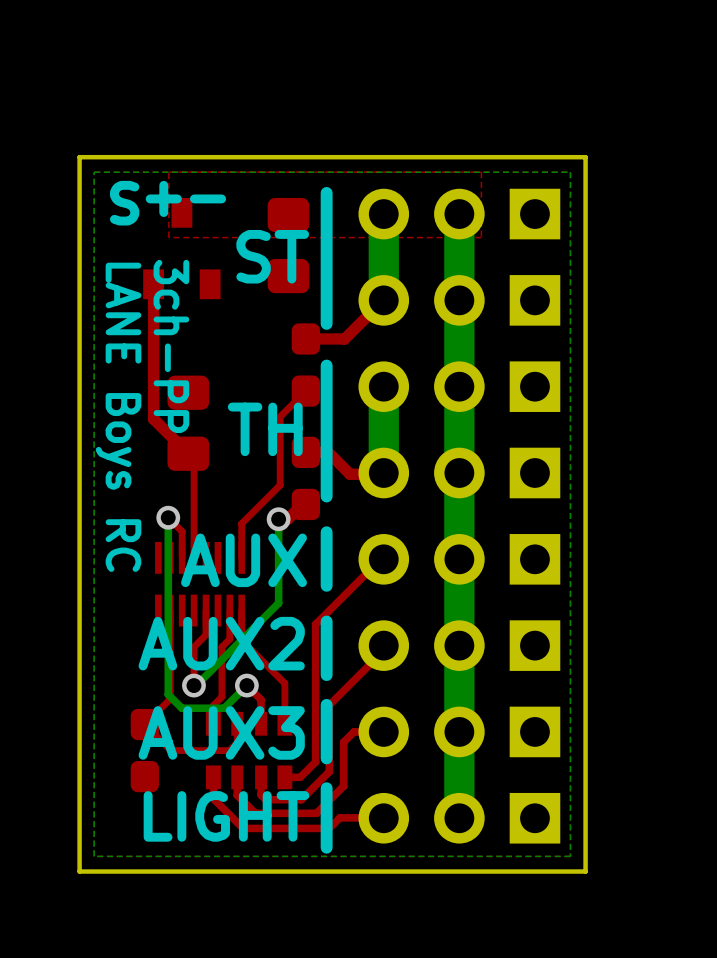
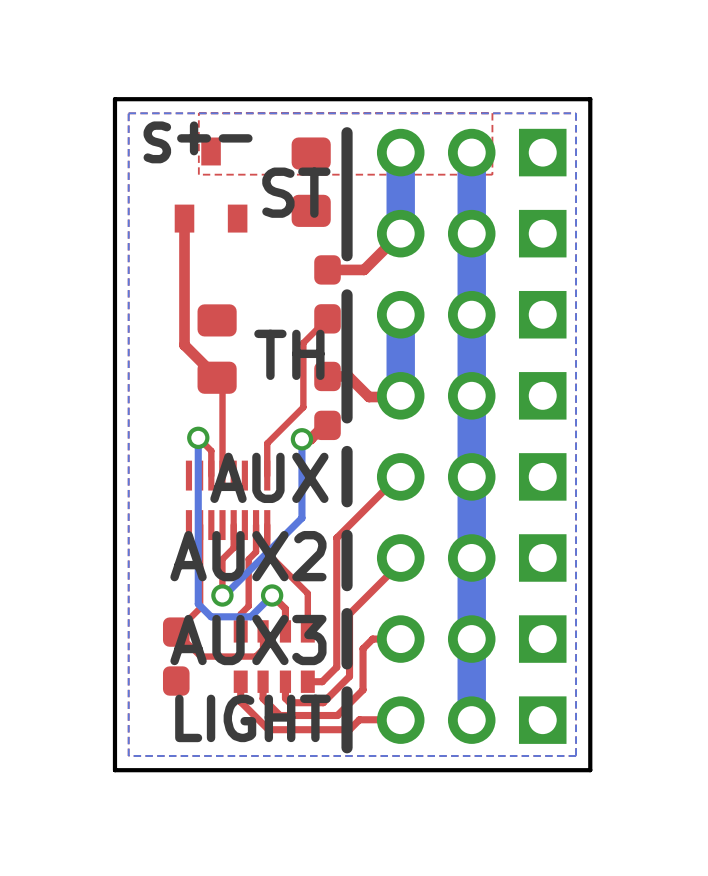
text: 3ch-PP (171, 346) -> none
text: LANE Boys RC (118, 417) -> none

